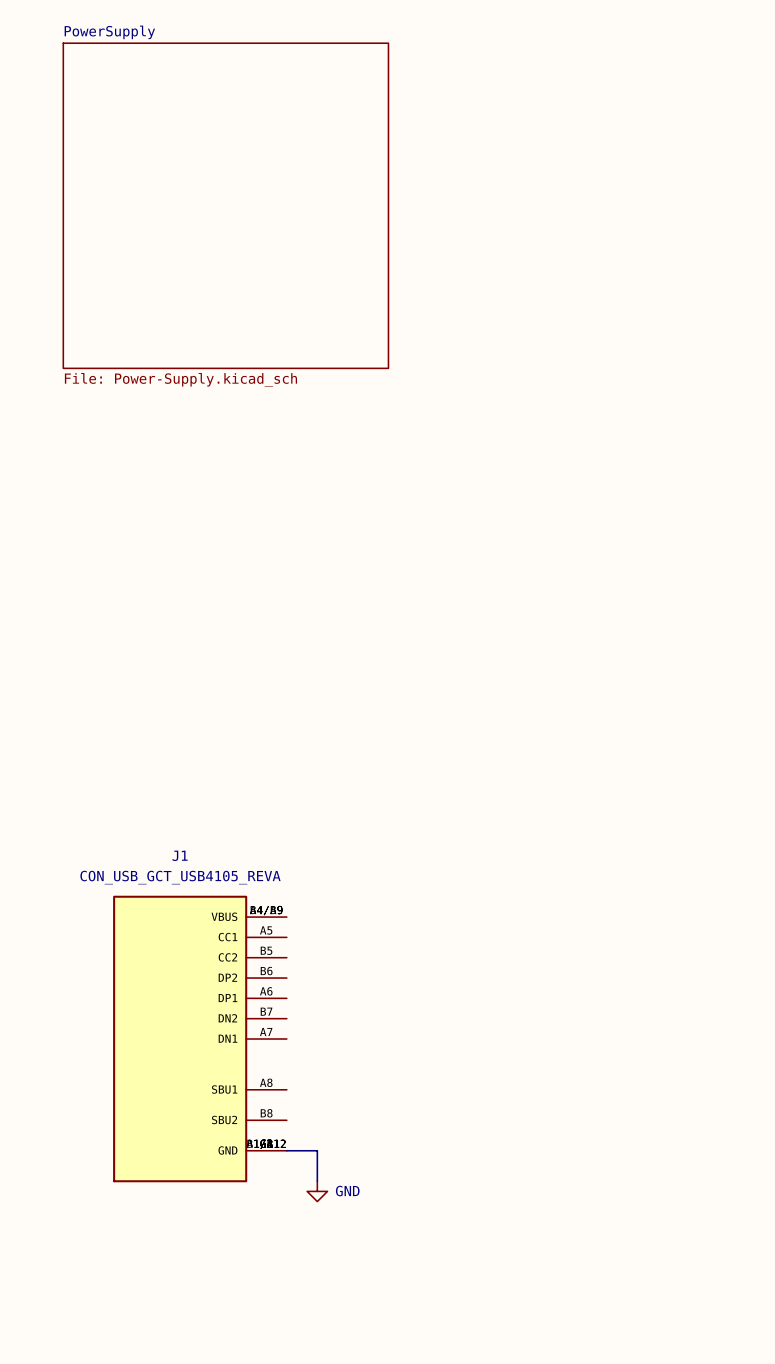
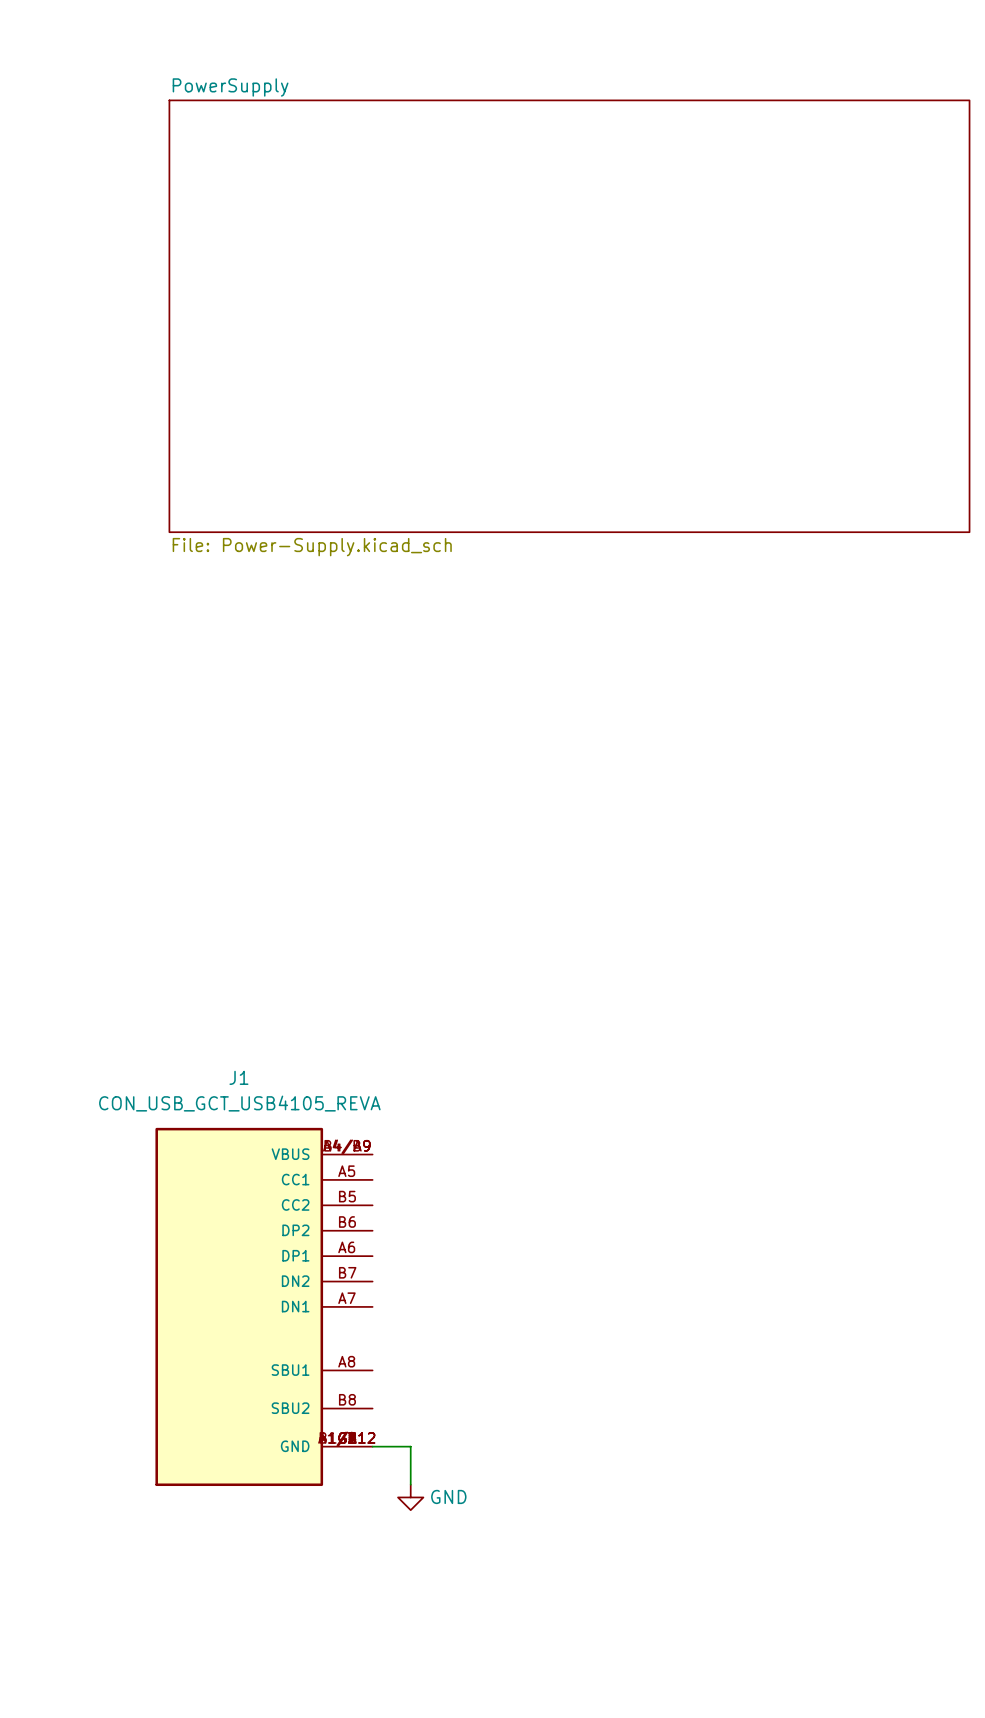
sheet PowerSupply: File: Power-Supply.kicad_sch (225, 205) -> none
sheet PowerSupply: none -> File: Power-Supply.kicad_sch (569, 316)

